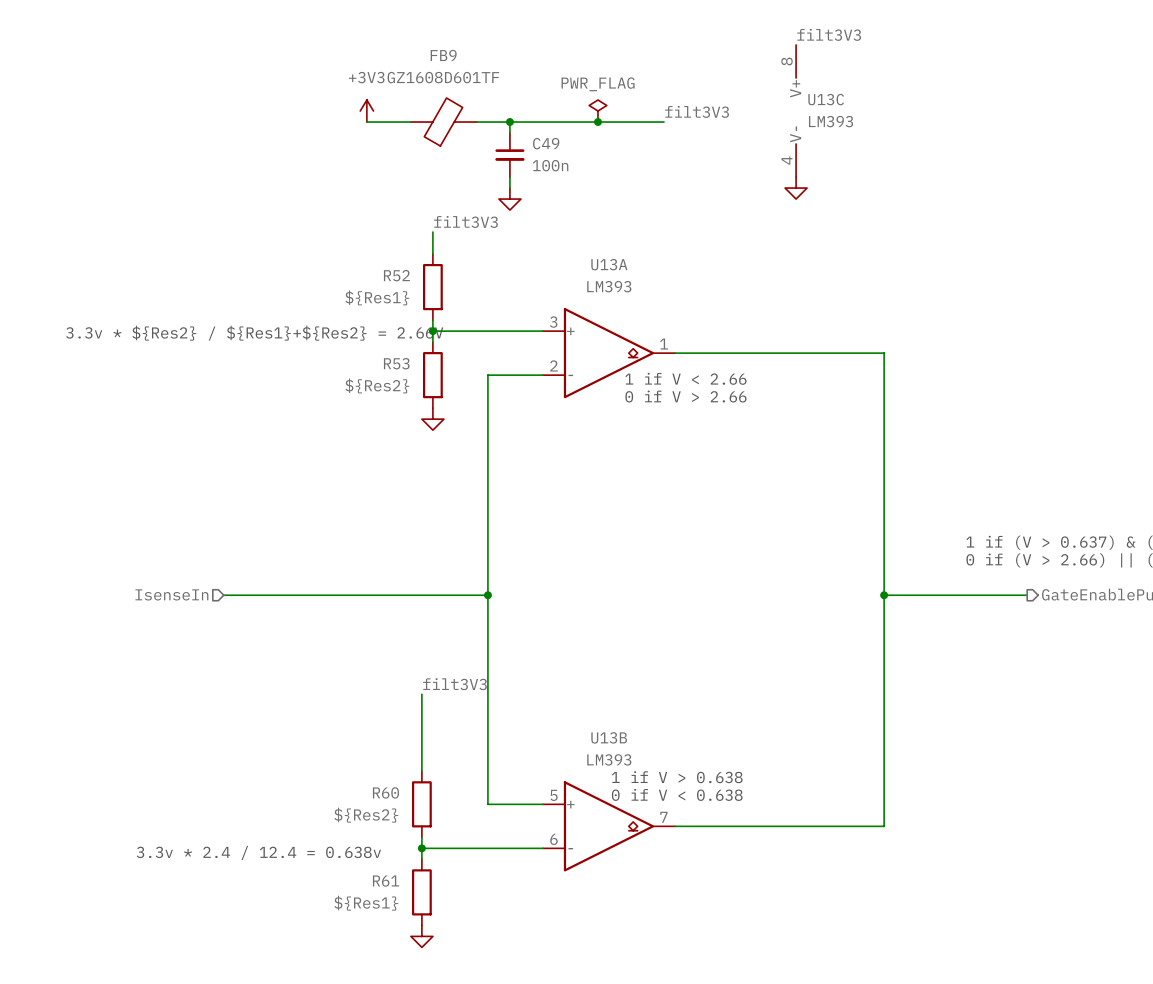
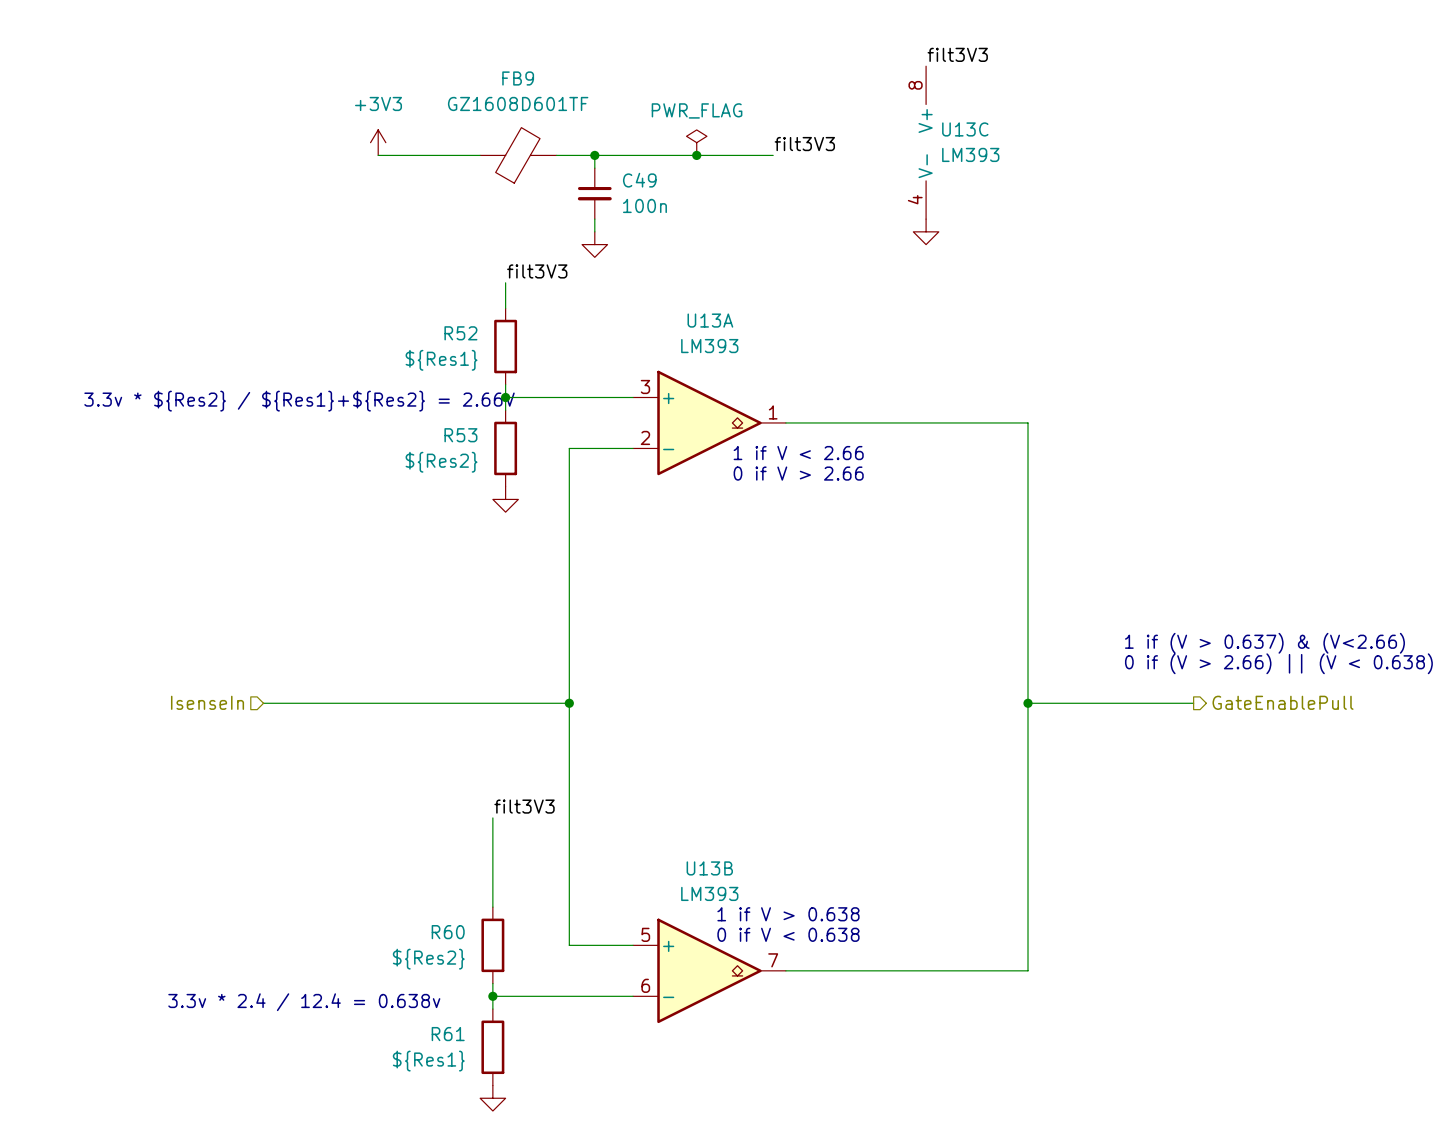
power symbol position: +3V3 (366, 111) -> +3V3 (378, 142)
wire: none -> (378, 155) (429, 155)

